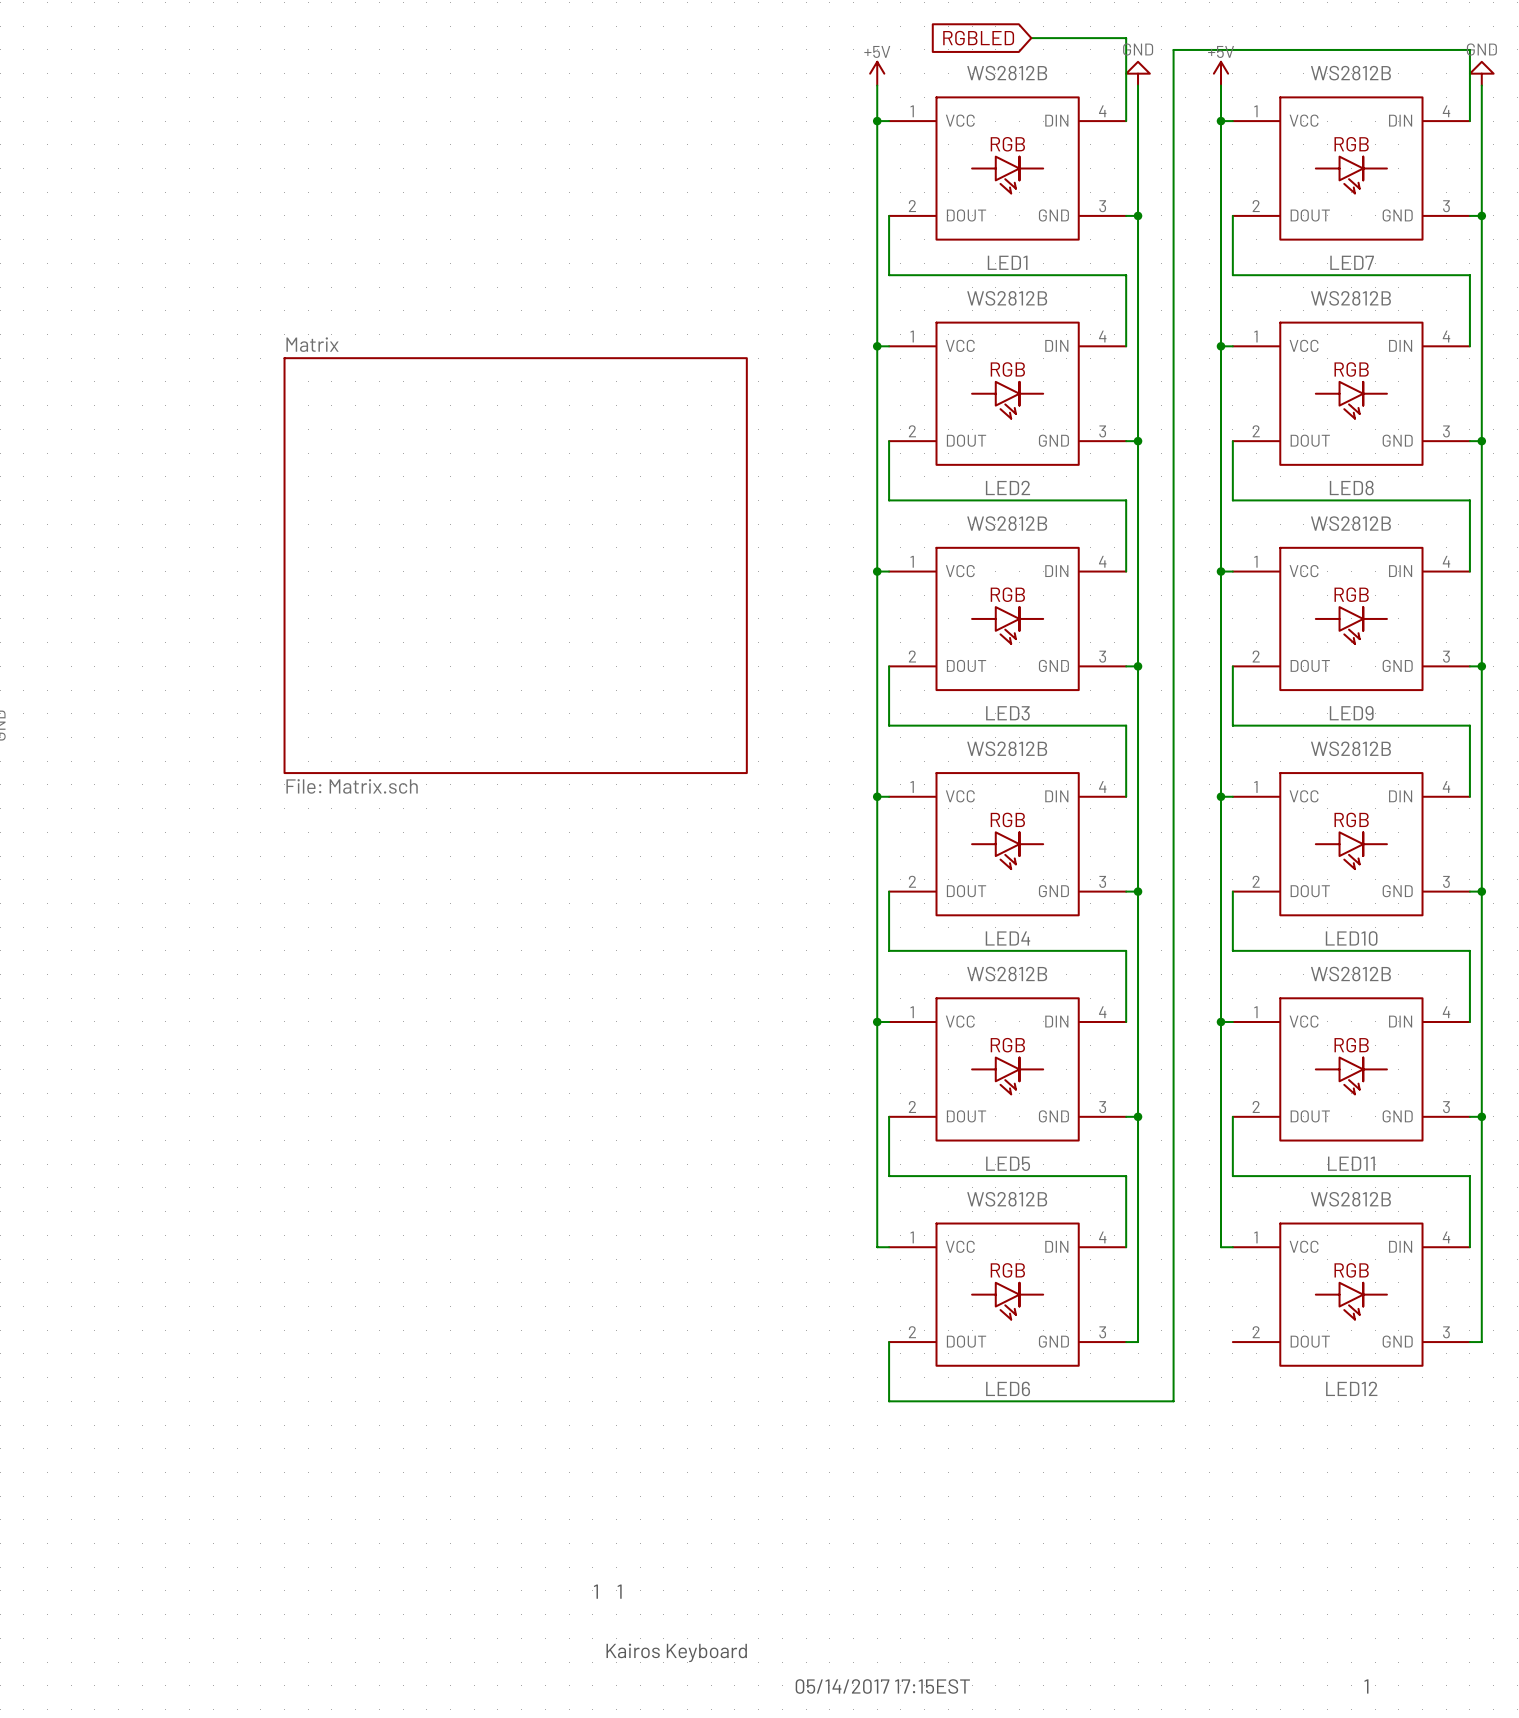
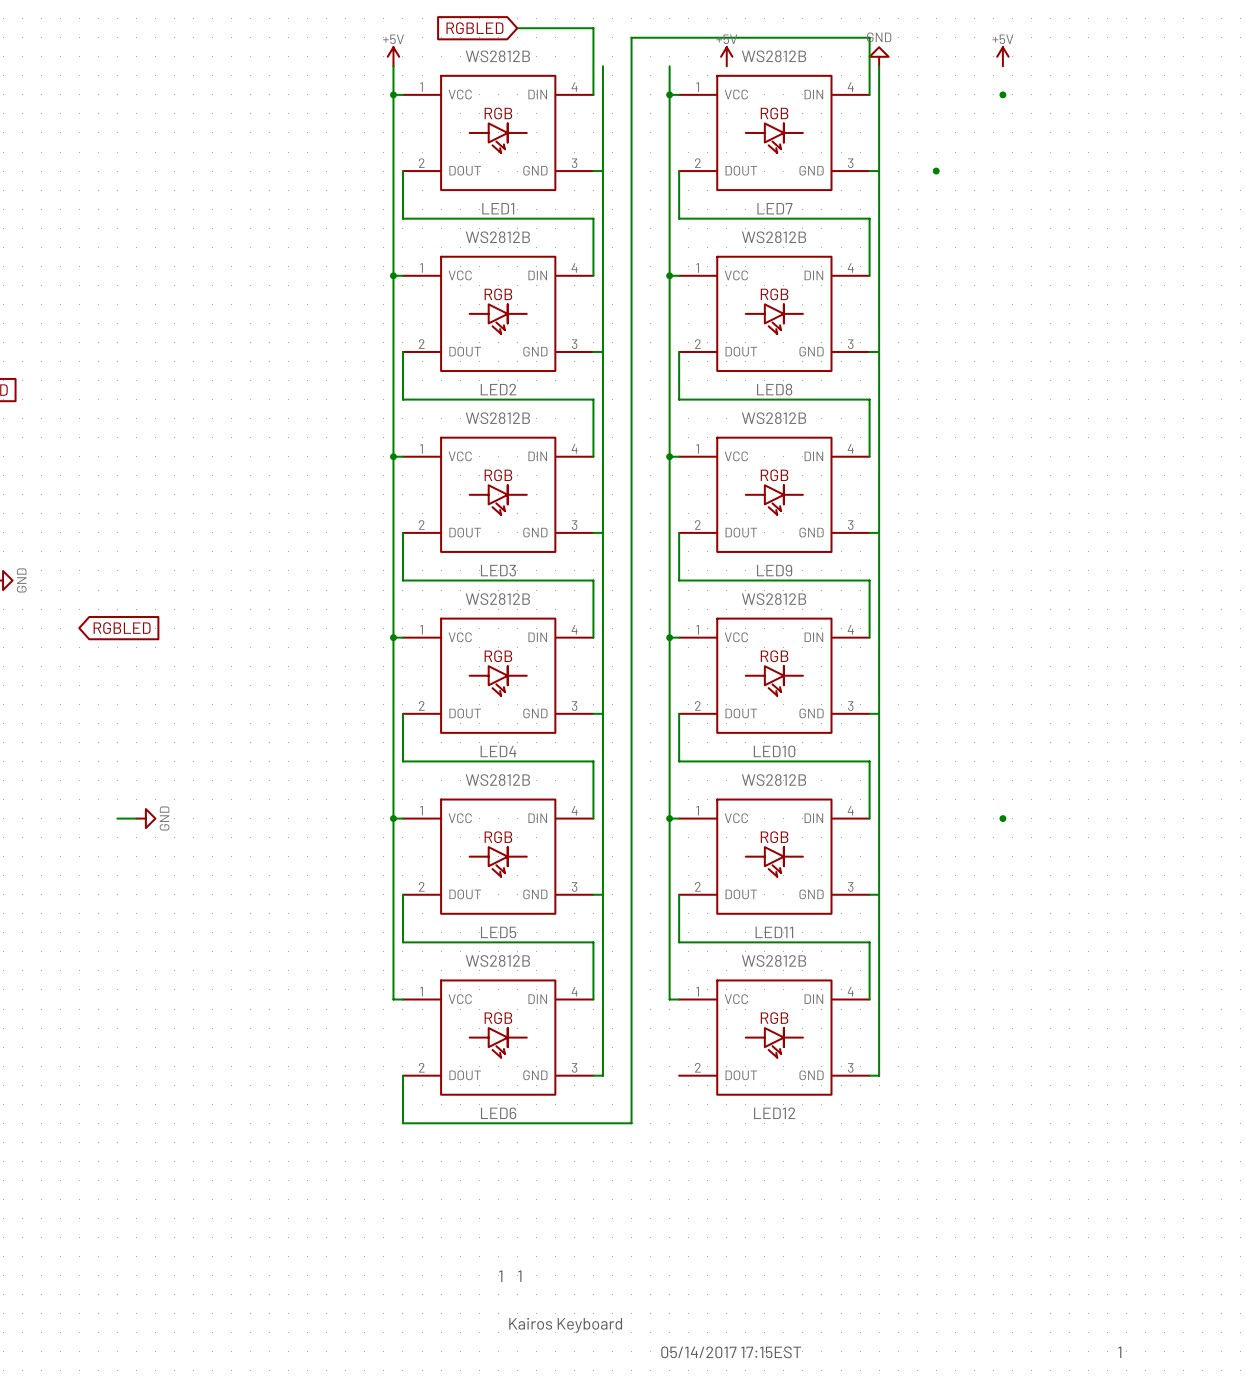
global label: none -> RGBLED (474, 28)
wire: none -> (517, 28) (593, 28) (593, 94)
global label: RGBLED (978, 38) -> none
wire: (1031, 38) (1126, 38) (1126, 121) -> none
power symbol: none -> +5V (393, 56)
power symbol position: GND (1138, 73) -> GND (879, 56)
power symbol: GND (1481, 73) -> none
wire: none -> (393, 66) (393, 999) (402, 999)
wire: none -> (602, 66) (602, 1075) (593, 1075)
wire: (877, 85) (877, 1247) (889, 1247) -> (669, 66) (669, 999) (679, 999)
wire: (1138, 85) (1138, 1342) (1126, 1342) -> (879, 66) (879, 1075) (869, 1075)
wire: (1221, 85) (1221, 1247) (1232, 1247) -> none
wire: (1481, 85) (1481, 1342) (1469, 1342) -> none
wire: none -> (393, 94) (402, 94)
junction: none -> (393, 94)
junction: none -> (669, 94)
wire: (877, 121) (889, 121) -> (669, 94) (679, 94)
junction: (877, 121) -> none
wire: none -> (869, 94) (869, 37) (631, 37) (631, 1123) (402, 1123) (402, 1075)
wire: (1221, 121) (1232, 121) -> none
wire: (1469, 121) (1469, 49) (1173, 49) (1173, 1401) (889, 1401) (889, 1342) -> none
LED1 position: (1007, 168) -> (498, 132)
LED7 position: (1351, 168) -> (774, 132)
wire: none -> (402, 171) (402, 218) (593, 218) (593, 275)
wire: none -> (593, 171) (602, 171)
wire: (889, 215) (889, 275) -> (679, 171) (679, 218) (736, 218)
wire: (1126, 215) (1138, 215) -> (869, 171) (879, 171)
wire: (1232, 215) (1232, 275) (1469, 275) (1469, 346) -> none
wire: (1469, 215) (1481, 215) -> none
junction: (1481, 215) -> none
wire: (1055, 275) (1126, 275) (1126, 346) -> (869, 218) (869, 275)
wire: none -> (393, 275) (402, 275)
junction: none -> (393, 275)
junction: none -> (669, 275)
wire: (877, 346) (889, 346) -> (669, 275) (679, 275)
junction: (877, 346) -> none
wire: (1221, 346) (1232, 346) -> none
junction: (1221, 346) -> none
LED2 position: (1007, 393) -> (498, 313)
LED8 position: (1351, 393) -> (774, 313)
wire: none -> (402, 351) (402, 399) (593, 399) (593, 456)
wire: none -> (593, 351) (602, 351)
wire: (889, 441) (889, 500) -> (679, 351) (679, 399) (736, 399)
wire: (1126, 441) (1138, 441) -> (869, 351) (879, 351)
junction: (1138, 441) -> none
wire: (1232, 441) (1232, 500) (1469, 500) (1469, 571) -> none
wire: (1469, 441) (1481, 441) -> none
junction: (1481, 441) -> none
wire: (1055, 500) (1126, 500) (1126, 571) -> (869, 399) (869, 456)
sheet Matrix: File: Matrix.sch (515, 565) -> none
wire: none -> (393, 456) (402, 456)
junction: none -> (393, 456)
junction: none -> (669, 456)
wire: (877, 571) (889, 571) -> (669, 456) (679, 456)
junction: (877, 571) -> none
wire: (1221, 571) (1232, 571) -> none
junction: (1221, 571) -> none
LED3 position: (1007, 618) -> (498, 494)
LED9 position: (1351, 618) -> (774, 494)
wire: none -> (402, 532) (402, 580) (593, 580) (593, 637)
wire: none -> (593, 532) (602, 532)
wire: (889, 666) (889, 725) -> (679, 532) (679, 580) (736, 580)
wire: (1126, 666) (1138, 666) -> (869, 532) (879, 532)
junction: (1138, 666) -> none
wire: (1232, 666) (1232, 725) (1469, 725) (1469, 796) -> none
wire: (1469, 666) (1481, 666) -> none
junction: (1481, 666) -> none
wire: (1055, 725) (1126, 725) (1126, 796) -> (869, 580) (869, 637)
global label: none -> RGBLED (122, 628)
wire: none -> (393, 637) (402, 637)
junction: none -> (393, 637)
junction: none -> (669, 637)
wire: (877, 796) (889, 796) -> (669, 637) (679, 637)
junction: (877, 796) -> none
wire: (1221, 796) (1232, 796) -> none
junction: (1221, 796) -> none
LED4 position: (1007, 844) -> (498, 675)
LED10 position: (1351, 844) -> (774, 675)
wire: none -> (402, 713) (402, 761) (593, 761) (593, 818)
wire: none -> (593, 713) (602, 713)
wire: (889, 891) (889, 950) -> (679, 713) (679, 761) (736, 761)
wire: (1126, 891) (1138, 891) -> (869, 713) (879, 713)
junction: (1138, 891) -> none
wire: (1232, 891) (1232, 950) (1469, 950) (1469, 1021) -> none
wire: (1469, 891) (1481, 891) -> none
junction: (1481, 891) -> none
wire: (1055, 950) (1126, 950) (1126, 1021) -> (869, 761) (869, 818)
wire: none -> (117, 818) (136, 818)
power symbol: none -> GND (145, 818)
wire: none -> (393, 818) (402, 818)
junction: none -> (393, 818)
junction: none -> (669, 818)
wire: (877, 1021) (889, 1021) -> (669, 818) (679, 818)
junction: (877, 1021) -> none
wire: (1221, 1021) (1232, 1021) -> none
LED5 position: (1007, 1069) -> (498, 856)
LED11 position: (1351, 1069) -> (774, 856)
wire: none -> (402, 894) (402, 942) (593, 942) (593, 999)
wire: none -> (593, 894) (602, 894)
wire: (889, 1116) (889, 1176) -> (679, 894) (679, 942) (736, 942)
wire: (1126, 1116) (1138, 1116) -> (869, 894) (879, 894)
junction: (1138, 1116) -> none
wire: (1232, 1116) (1232, 1176) (1469, 1176) (1469, 1247) -> none
wire: (1469, 1116) (1481, 1116) -> none
junction: (1481, 1116) -> none
wire: (1055, 1176) (1126, 1176) (1126, 1247) -> (869, 942) (869, 999)
LED6 position: (1007, 1294) -> (498, 1037)
LED12 position: (1351, 1294) -> (774, 1037)

